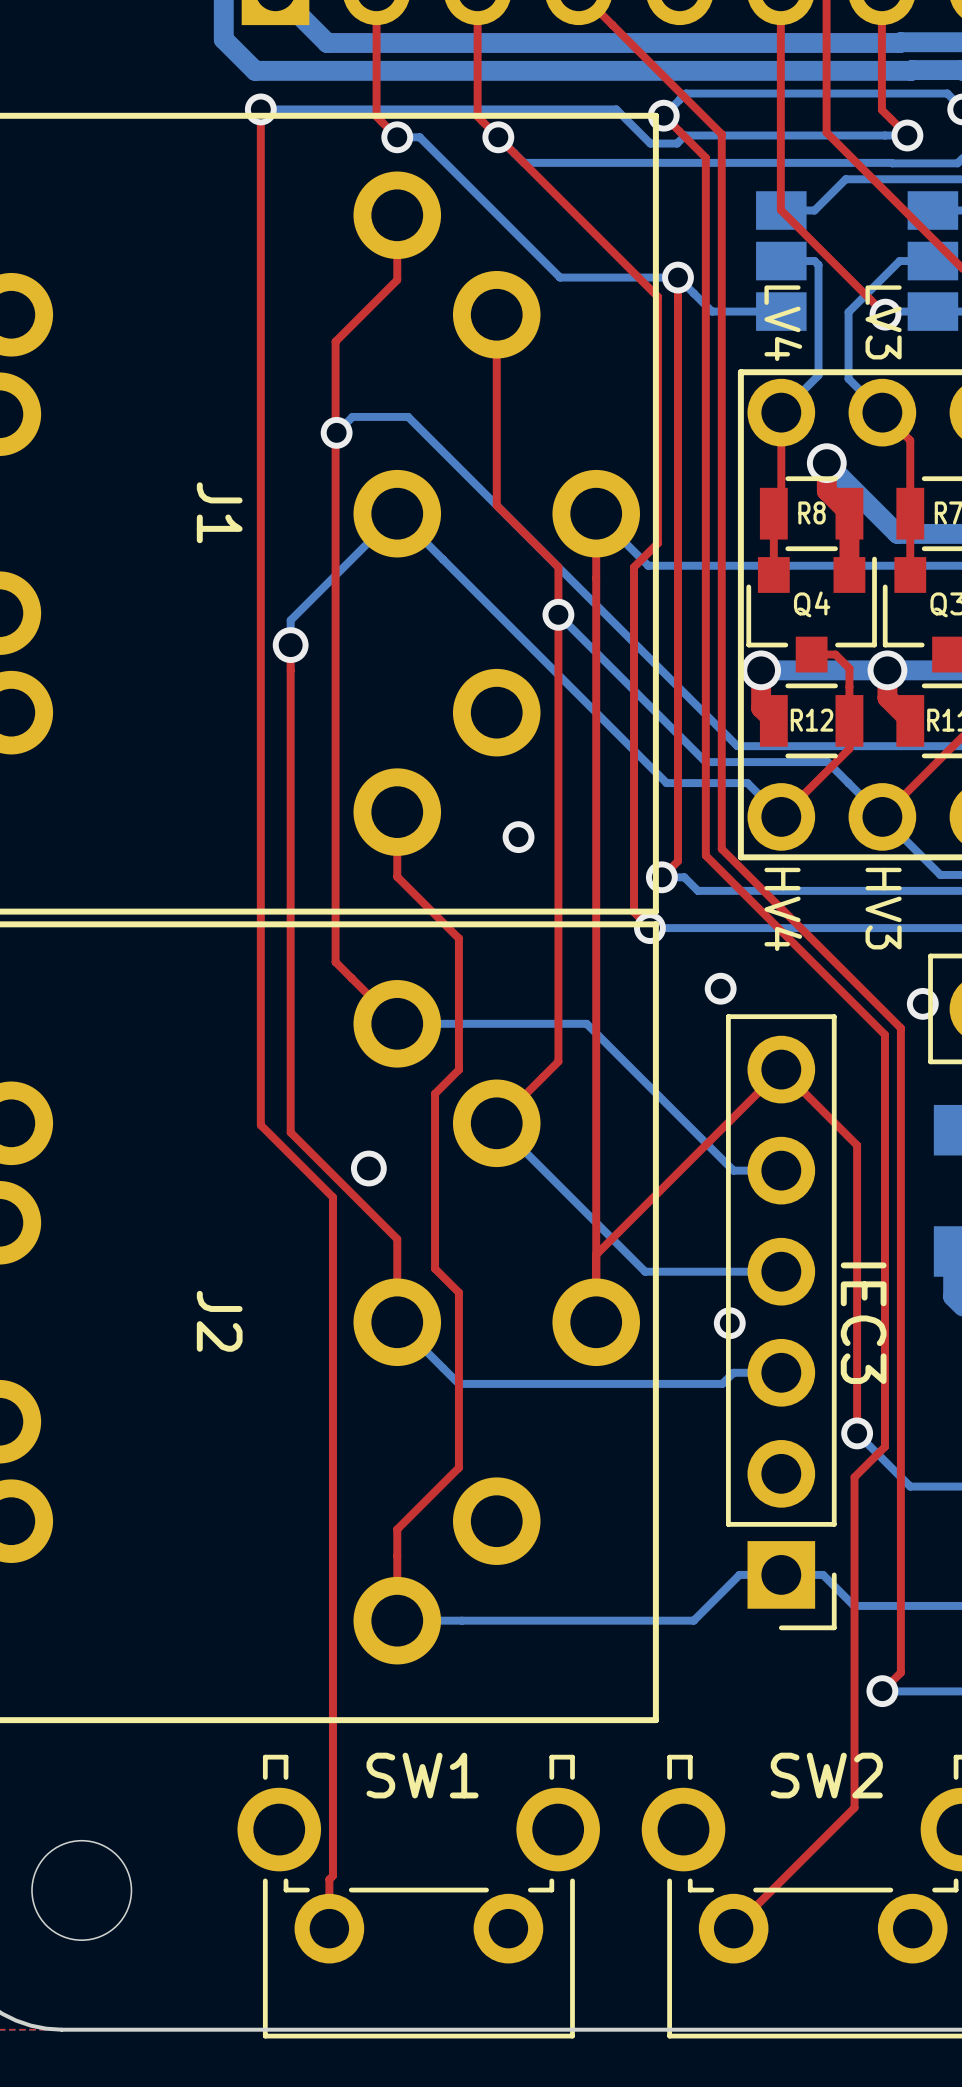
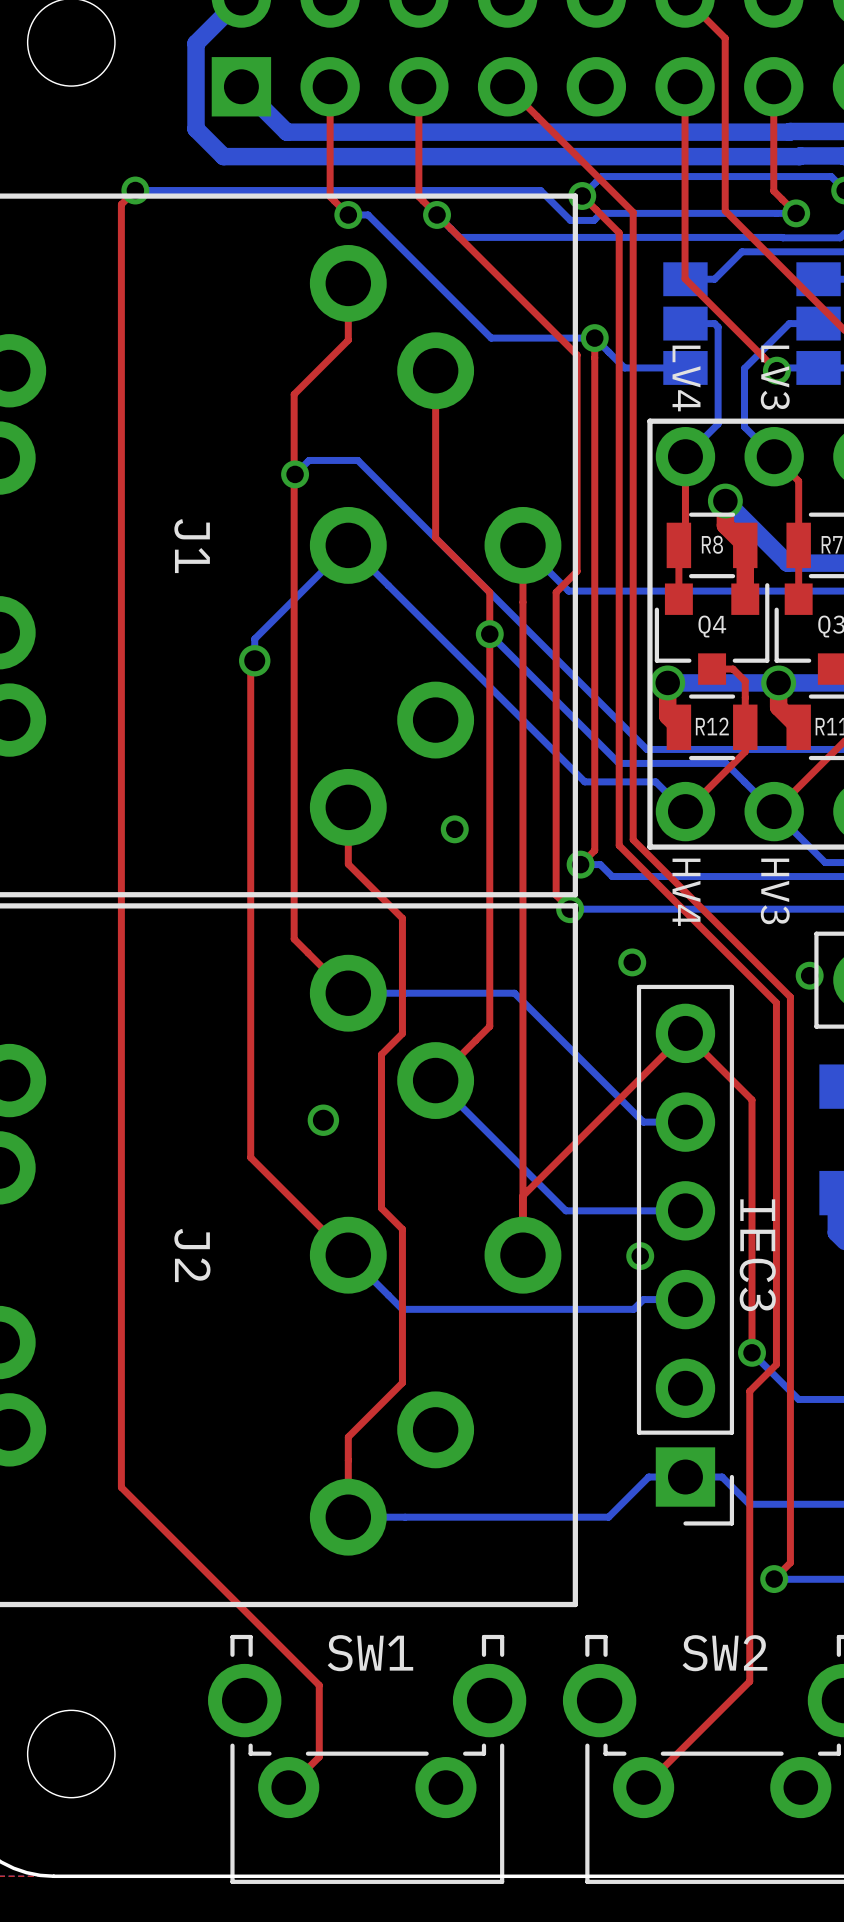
bottom track: none -> (135, 190) (228, 190)
top track: (260, 109) (260, 1125) (332, 1197) (332, 1875) (329, 1879) (329, 1928) -> (135, 190) (121, 204) (121, 1487) (319, 1685) (319, 1756) (288, 1787)
via position: (260, 109) -> (135, 190)
top track: (290, 645) (290, 1132) (397, 1239) (397, 1322) -> (250, 660) (250, 1157) (348, 1255)

